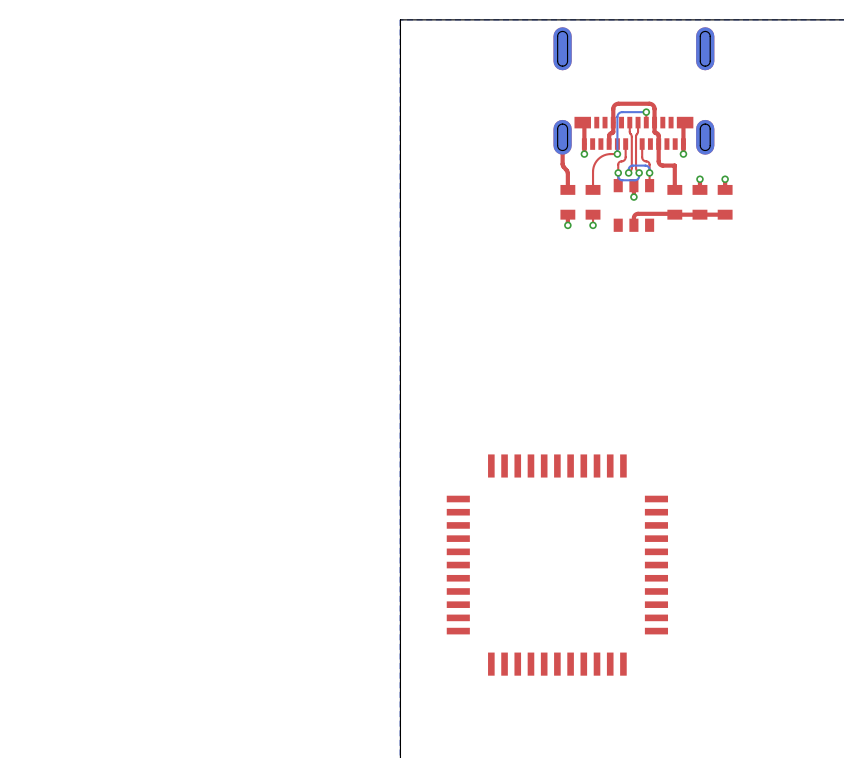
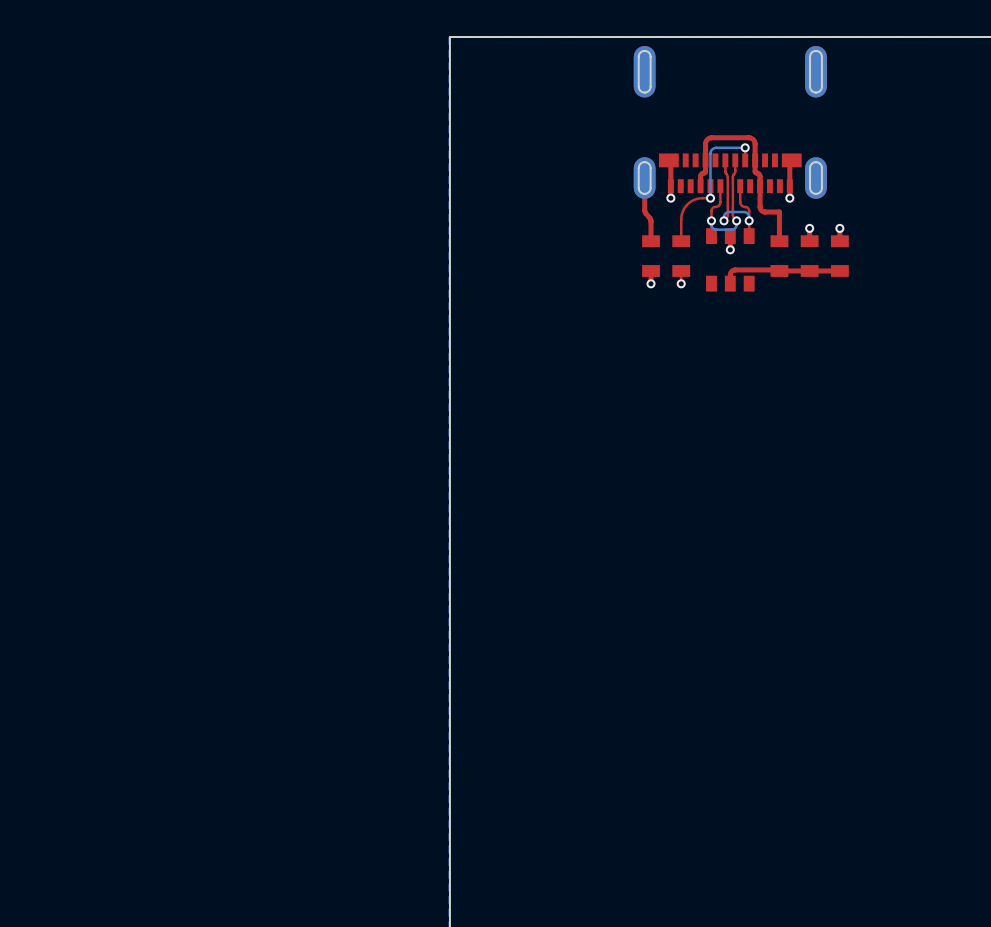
part: (557, 565) -> none

